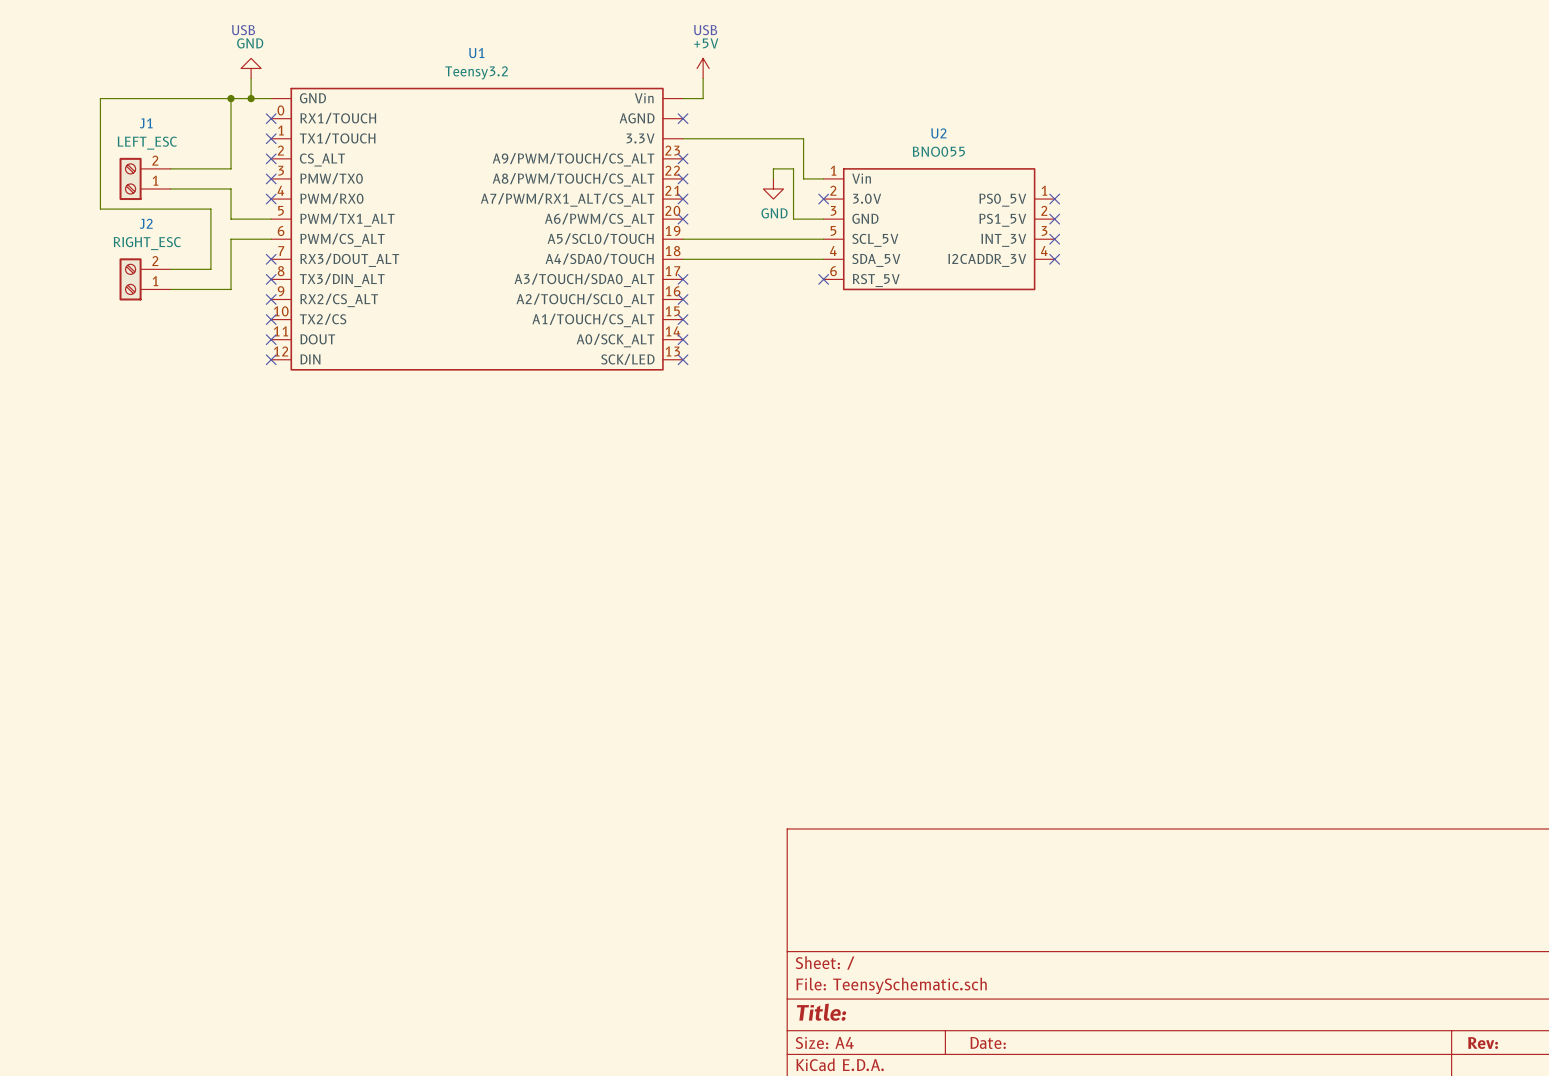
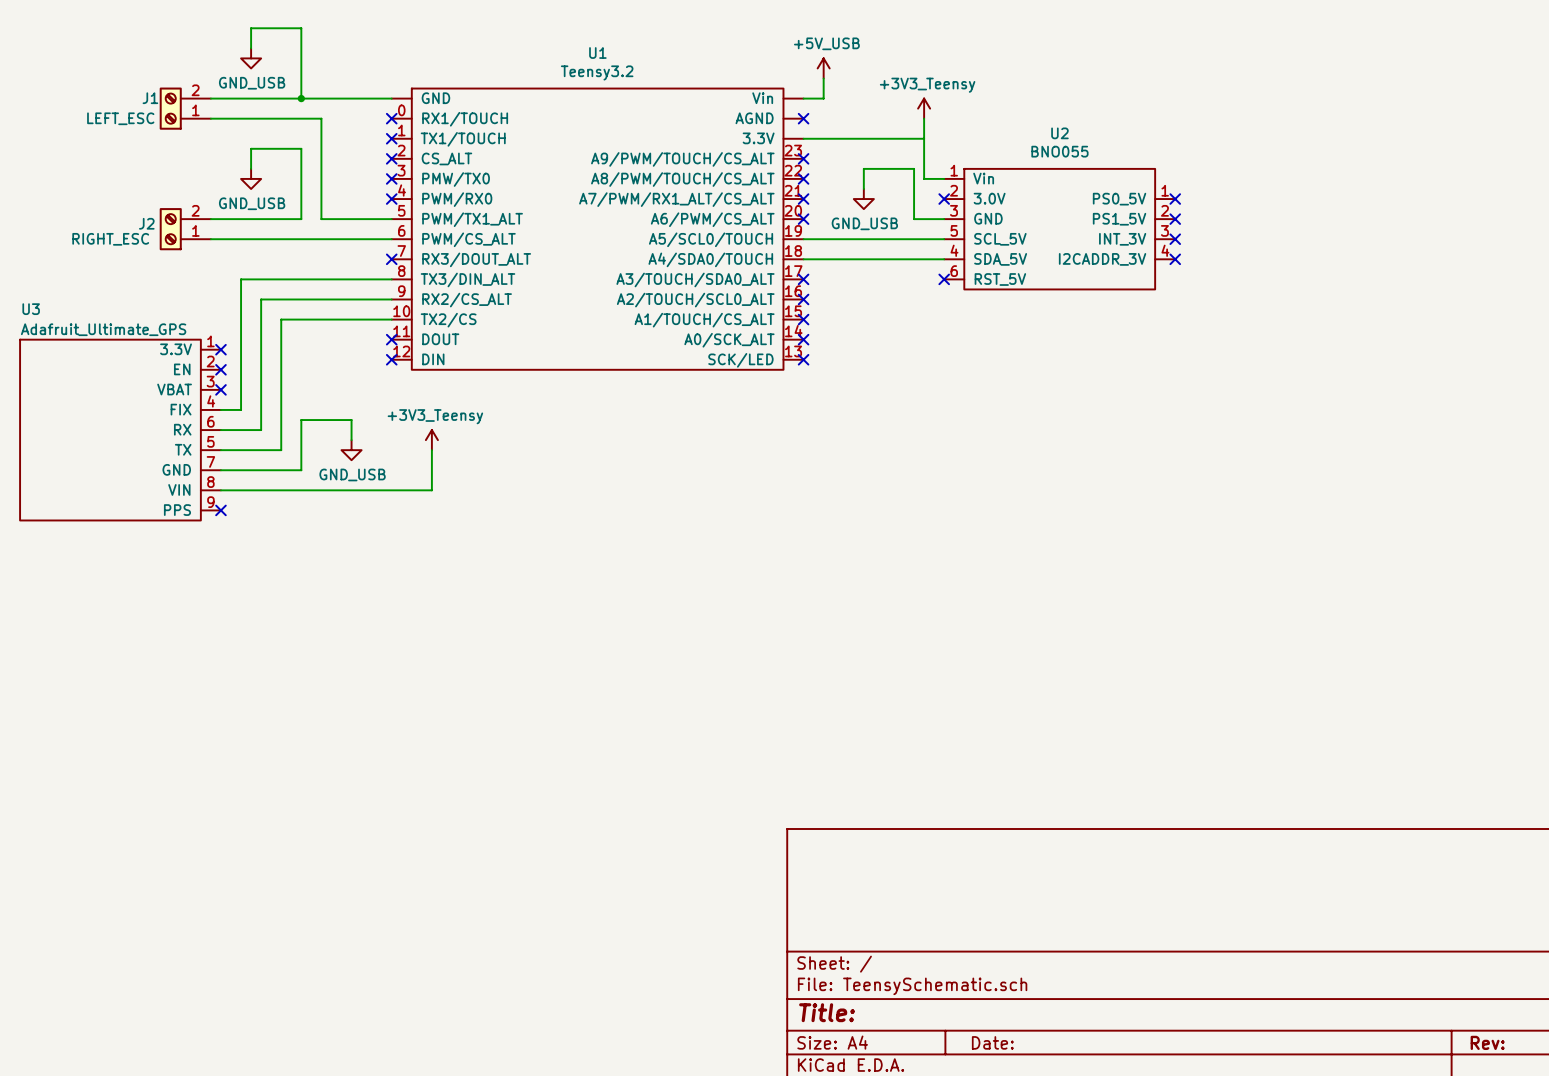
text: USB (243, 30) -> none
text: USB (705, 30) -> none
wire: none -> (251, 48) (251, 28) (301, 28) (301, 98)
power symbol: none -> GND_USB (251, 58)
power symbol: GND (251, 68) -> none
power symbol: +5V (703, 68) -> none
power symbol: none -> +5V_USB (823, 68)
wire: (251, 78) (251, 98) -> none
wire: (703, 78) (703, 98) (683, 98) -> (823, 78) (823, 98) (803, 98)
wire: (210, 98) (100, 98) (100, 209) (210, 209) (210, 269) (170, 269) -> none
wire: (231, 98) (231, 168) (170, 168) -> none
junction: (231, 98) -> none
junction: (251, 98) -> none
wire: none -> (271, 98) (391, 98)
junction: none -> (301, 98)
power symbol: none -> +3V3_Teensy (924, 108)
wire: none -> (210, 118) (321, 118) (321, 219) (391, 219)
no-connect mark: (271, 118) -> none
no-connect mark: none -> (391, 118)
no-connect mark: (683, 118) -> none
no-connect mark: none -> (803, 118)
wire: none -> (924, 118) (924, 178) (944, 178)
J1 name position: J1 (146, 123) -> J1 (150, 98)
no-connect mark: (271, 138) -> none
no-connect mark: none -> (391, 138)
wire: (683, 138) (803, 138) (803, 178) (823, 178) -> none
wire: none -> (803, 138) (924, 138)
J1 value position: LEFT_ESC (147, 143) -> LEFT_ESC (120, 118)
no-connect mark: (271, 158) -> none
no-connect mark: none -> (391, 158)
no-connect mark: (683, 158) -> none
no-connect mark: none -> (803, 158)
wire: none -> (251, 168) (251, 148) (301, 148) (301, 219) (271, 219)
J1 position: (145, 178) -> (185, 108)
power symbol: none -> GND_USB (251, 178)
no-connect mark: (271, 178) -> none
no-connect mark: none -> (391, 178)
no-connect mark: (683, 178) -> none
wire: (773, 178) (773, 168) (793, 168) (793, 219) (823, 219) -> none
no-connect mark: none -> (803, 178)
wire: (170, 188) (231, 188) (231, 219) -> (210, 219) (231, 219)
power symbol: GND (773, 188) -> none
wire: none -> (863, 188) (863, 168) (914, 168) (914, 219) (944, 219)
no-connect mark: (271, 199) -> none
no-connect mark: none -> (391, 199)
no-connect mark: (683, 199) -> none
no-connect mark: none -> (803, 199)
no-connect mark: (823, 199) -> none
power symbol: none -> GND_USB (863, 199)
no-connect mark: none -> (944, 199)
no-connect mark: (1054, 199) -> none
no-connect mark: none -> (1175, 199)
no-connect mark: (683, 219) -> none
no-connect mark: none -> (803, 219)
no-connect mark: (1054, 219) -> none
no-connect mark: none -> (1175, 219)
U1 position: (477, 229) -> (597, 229)
U2 position: (939, 229) -> (1059, 229)
wire: (231, 239) (231, 289) (170, 289) -> (231, 239) (210, 239)
wire: none -> (271, 239) (391, 239)
wire: (683, 239) (803, 239) -> (823, 239) (944, 239)
no-connect mark: (1054, 239) -> none
no-connect mark: none -> (1175, 239)
J2 value position: RIGHT_ESC (147, 243) -> RIGHT_ESC (110, 239)
no-connect mark: (271, 259) -> none
no-connect mark: none -> (391, 259)
wire: (683, 259) (803, 259) -> (823, 259) (944, 259)
no-connect mark: (1054, 259) -> none
no-connect mark: none -> (1175, 259)
J2 position: (145, 279) -> (185, 229)
no-connect mark: (271, 279) -> none
wire: none -> (391, 279) (241, 279) (241, 409) (220, 409)
no-connect mark: (683, 279) -> none
no-connect mark: none -> (803, 279)
no-connect mark: (823, 279) -> none
no-connect mark: none -> (944, 279)
no-connect mark: (271, 299) -> none
wire: none -> (391, 299) (261, 299) (261, 430) (220, 430)
no-connect mark: (683, 299) -> none
no-connect mark: none -> (803, 299)
no-connect mark: (271, 319) -> none
wire: none -> (391, 319) (281, 319) (281, 450) (220, 450)
no-connect mark: (683, 319) -> none
no-connect mark: none -> (803, 319)
no-connect mark: (271, 339) -> none
no-connect mark: none -> (391, 339)
no-connect mark: (683, 339) -> none
no-connect mark: none -> (803, 339)
no-connect mark: none -> (220, 349)
no-connect mark: (271, 359) -> none
no-connect mark: none -> (391, 359)
no-connect mark: (683, 359) -> none
no-connect mark: none -> (803, 359)
no-connect mark: none -> (220, 369)
no-connect mark: none -> (220, 389)
U3: none -> Adafruit_Ultimate_GPS (120, 430)
wire: none -> (351, 440) (351, 420) (301, 420) (301, 470) (220, 470)
power symbol: none -> +3V3_Teensy (431, 440)
power symbol: none -> GND_USB (351, 450)
wire: none -> (431, 450) (431, 490) (220, 490)
no-connect mark: none -> (220, 510)

